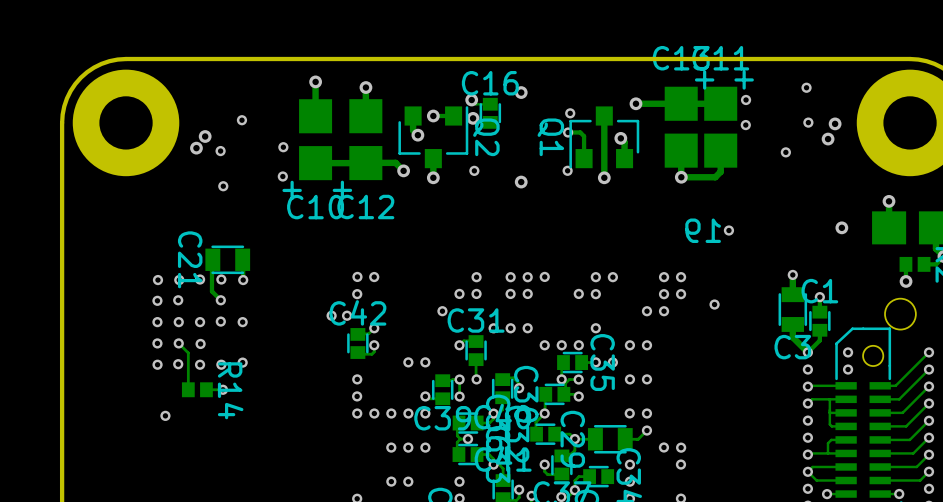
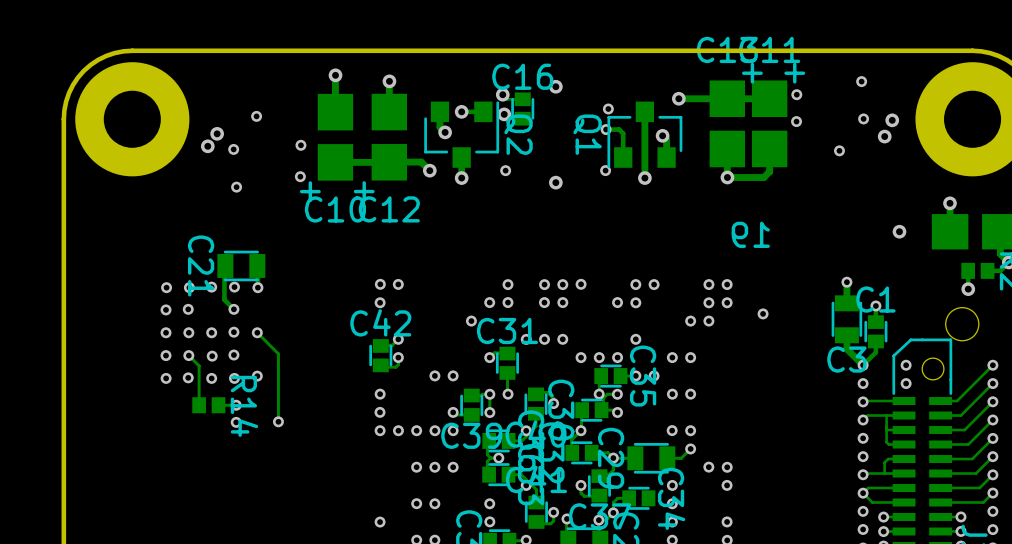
via: (728, 230) -> none
via: (331, 315) -> none
via: (347, 315) -> none
track: none -> (257, 332) (278, 353) (278, 421)
via: none -> (233, 355)
via: none -> (236, 422)
via: none -> (278, 421)
via: (165, 415) -> none

